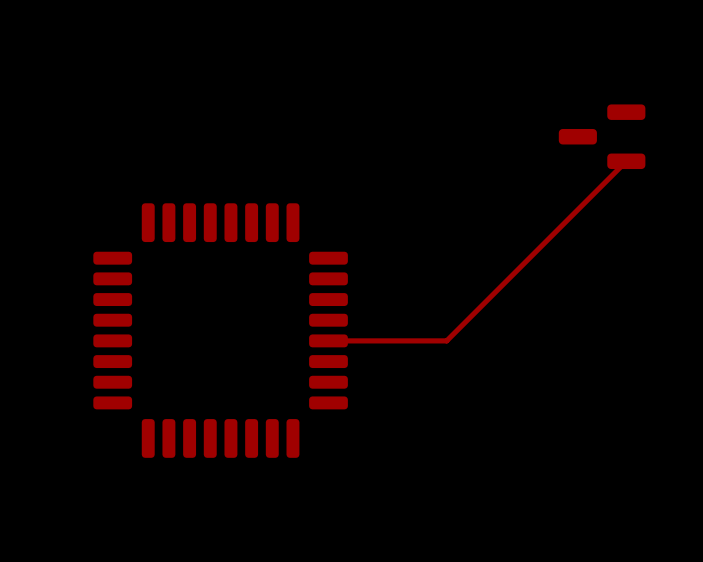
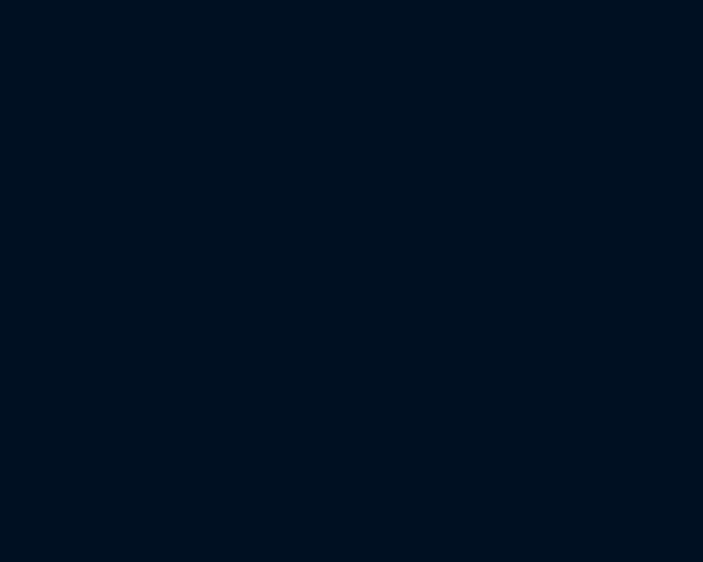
part: (602, 136) -> none
top track: (626, 161) (446, 340) (328, 340) -> none
part: (220, 330) -> none

